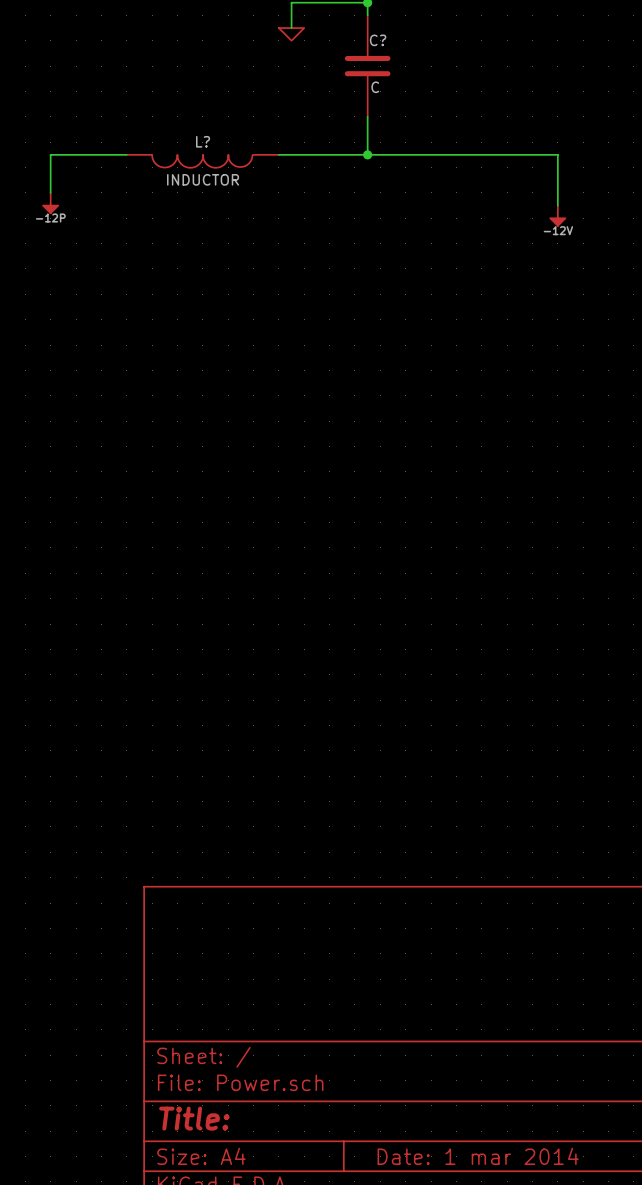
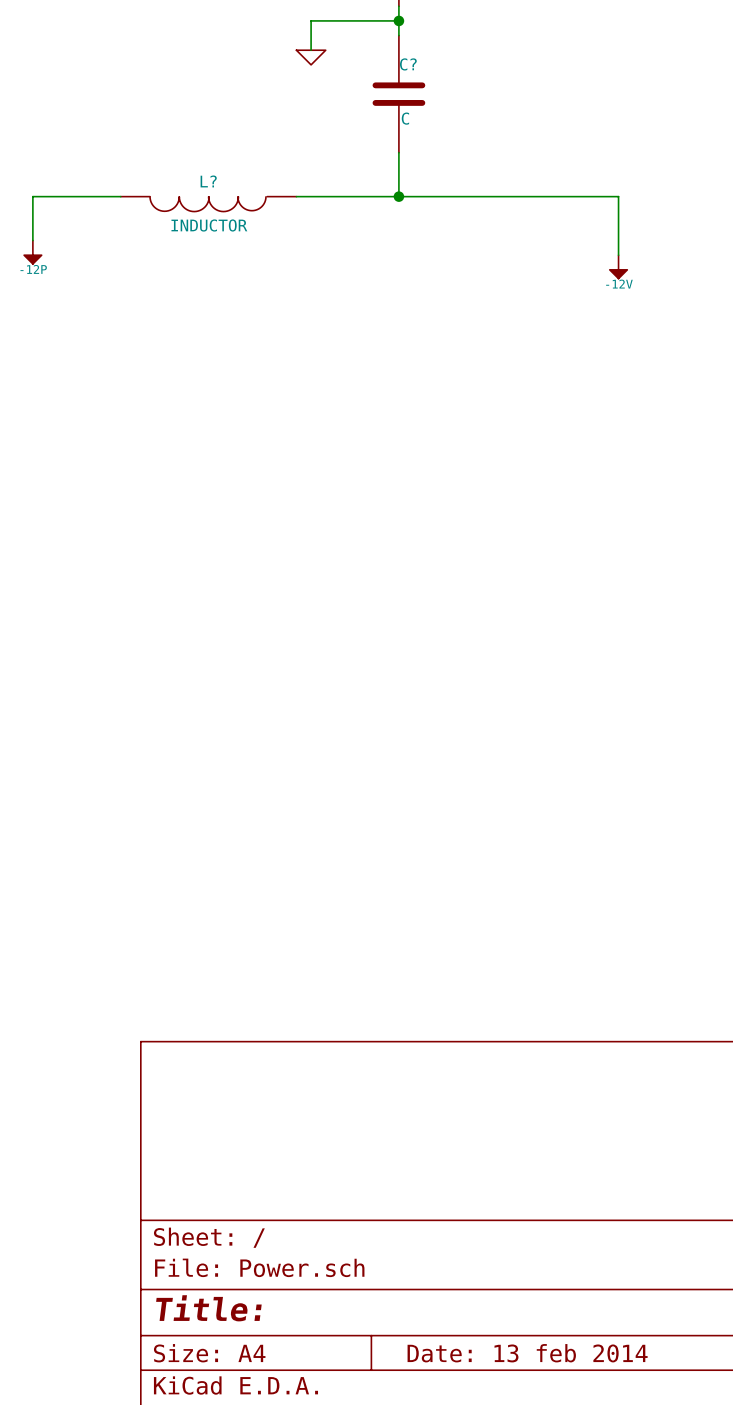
title block: Date: 1 mar 2014 (478, 1156) -> Date: 13 feb 2014 (527, 1353)

